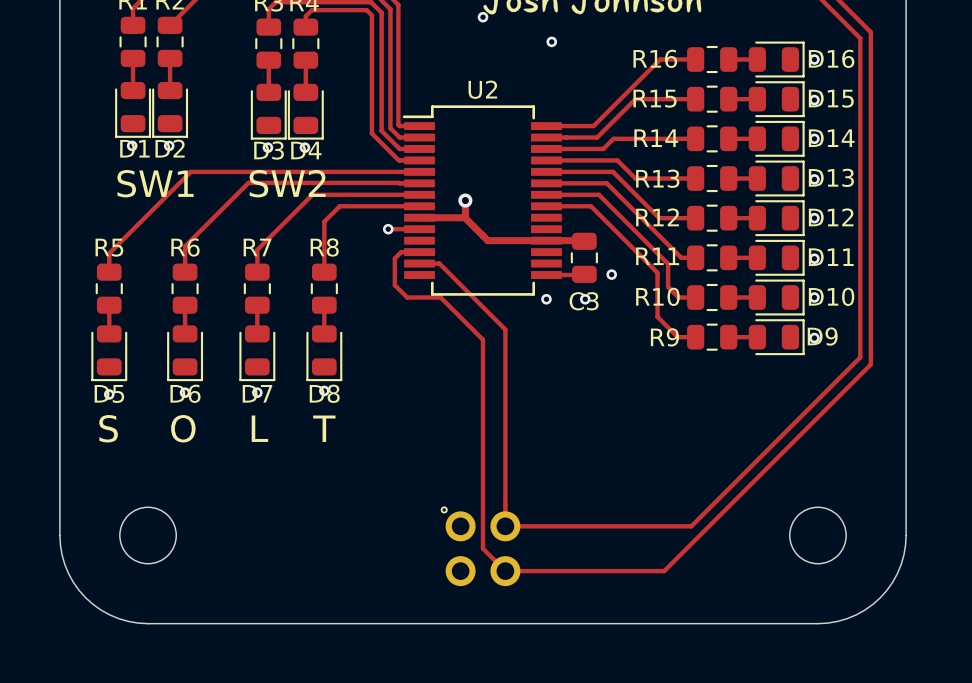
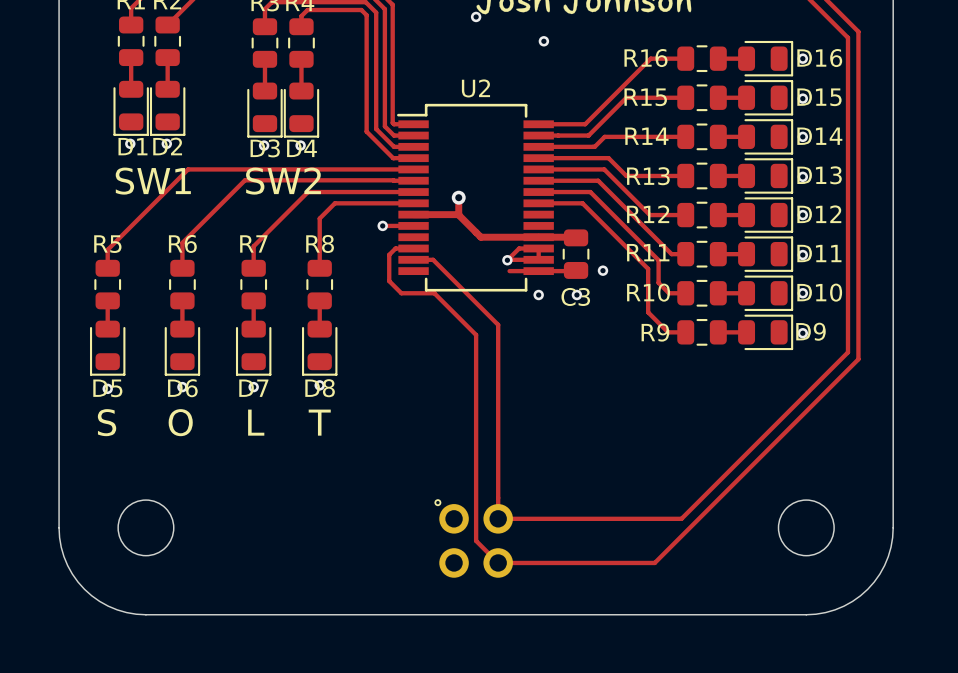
track: none -> (507, 259) (538, 259) (538, 248) (519, 248) (507, 260)
via: none -> (507, 260)
track: none -> (509, 271) (538, 271)

